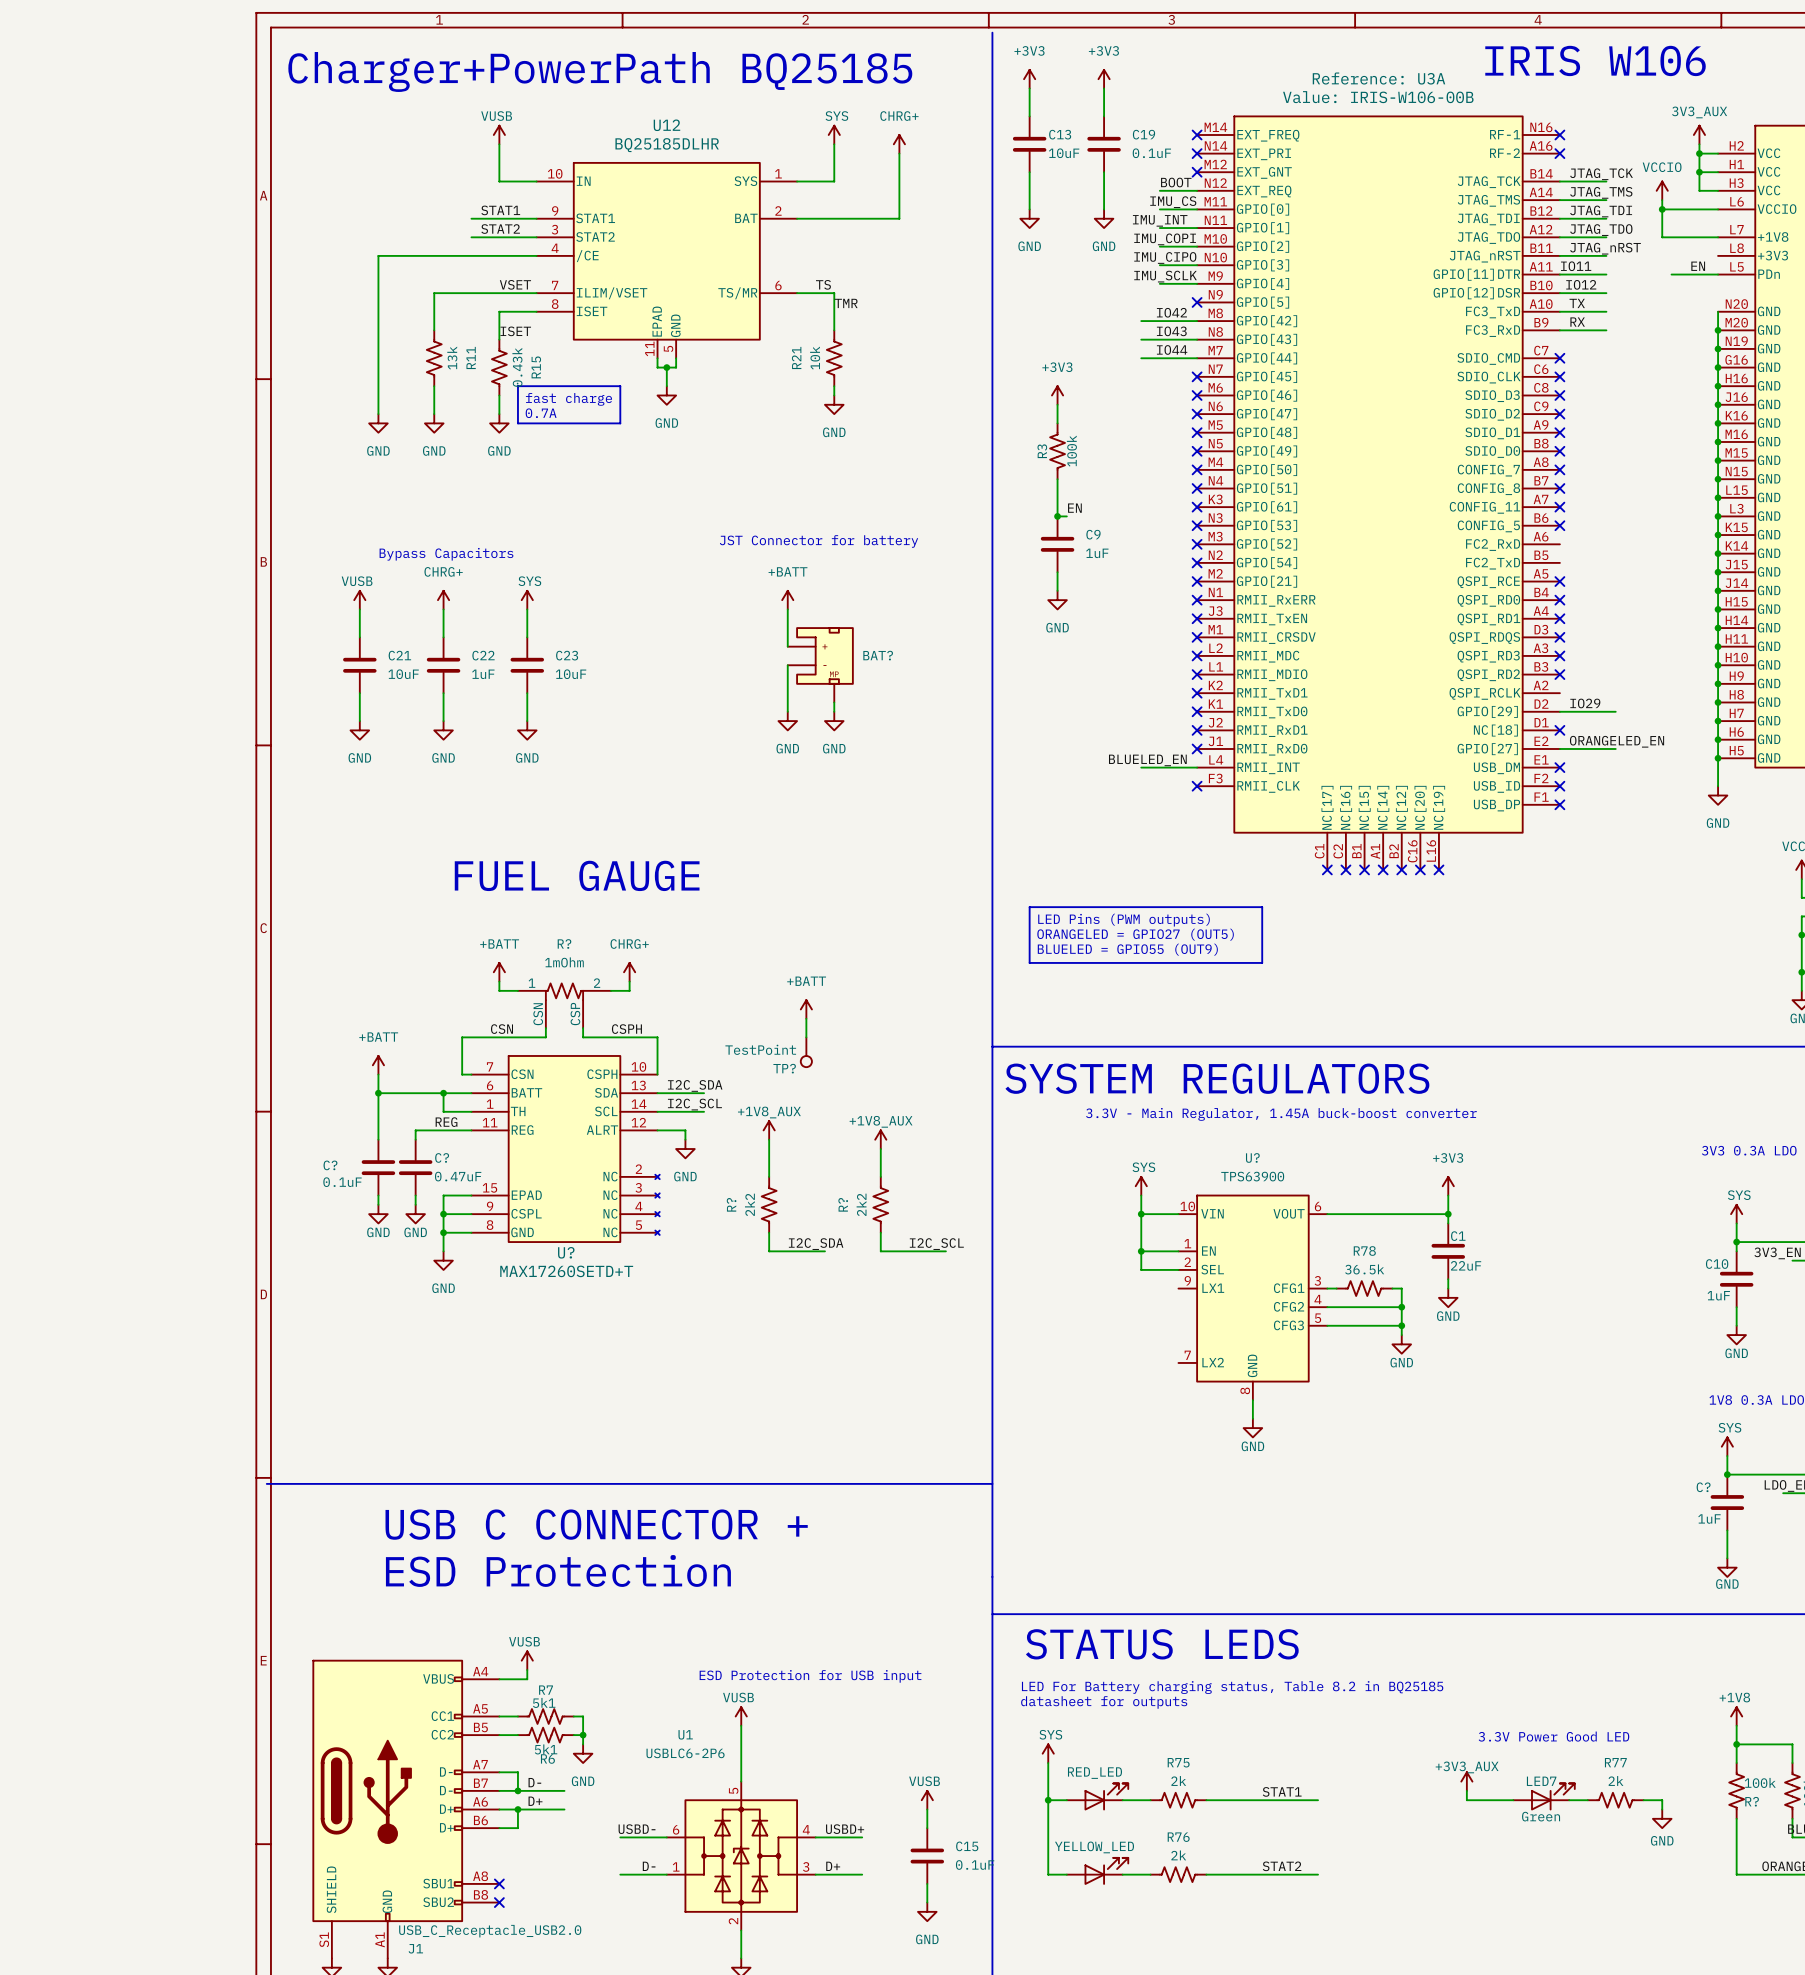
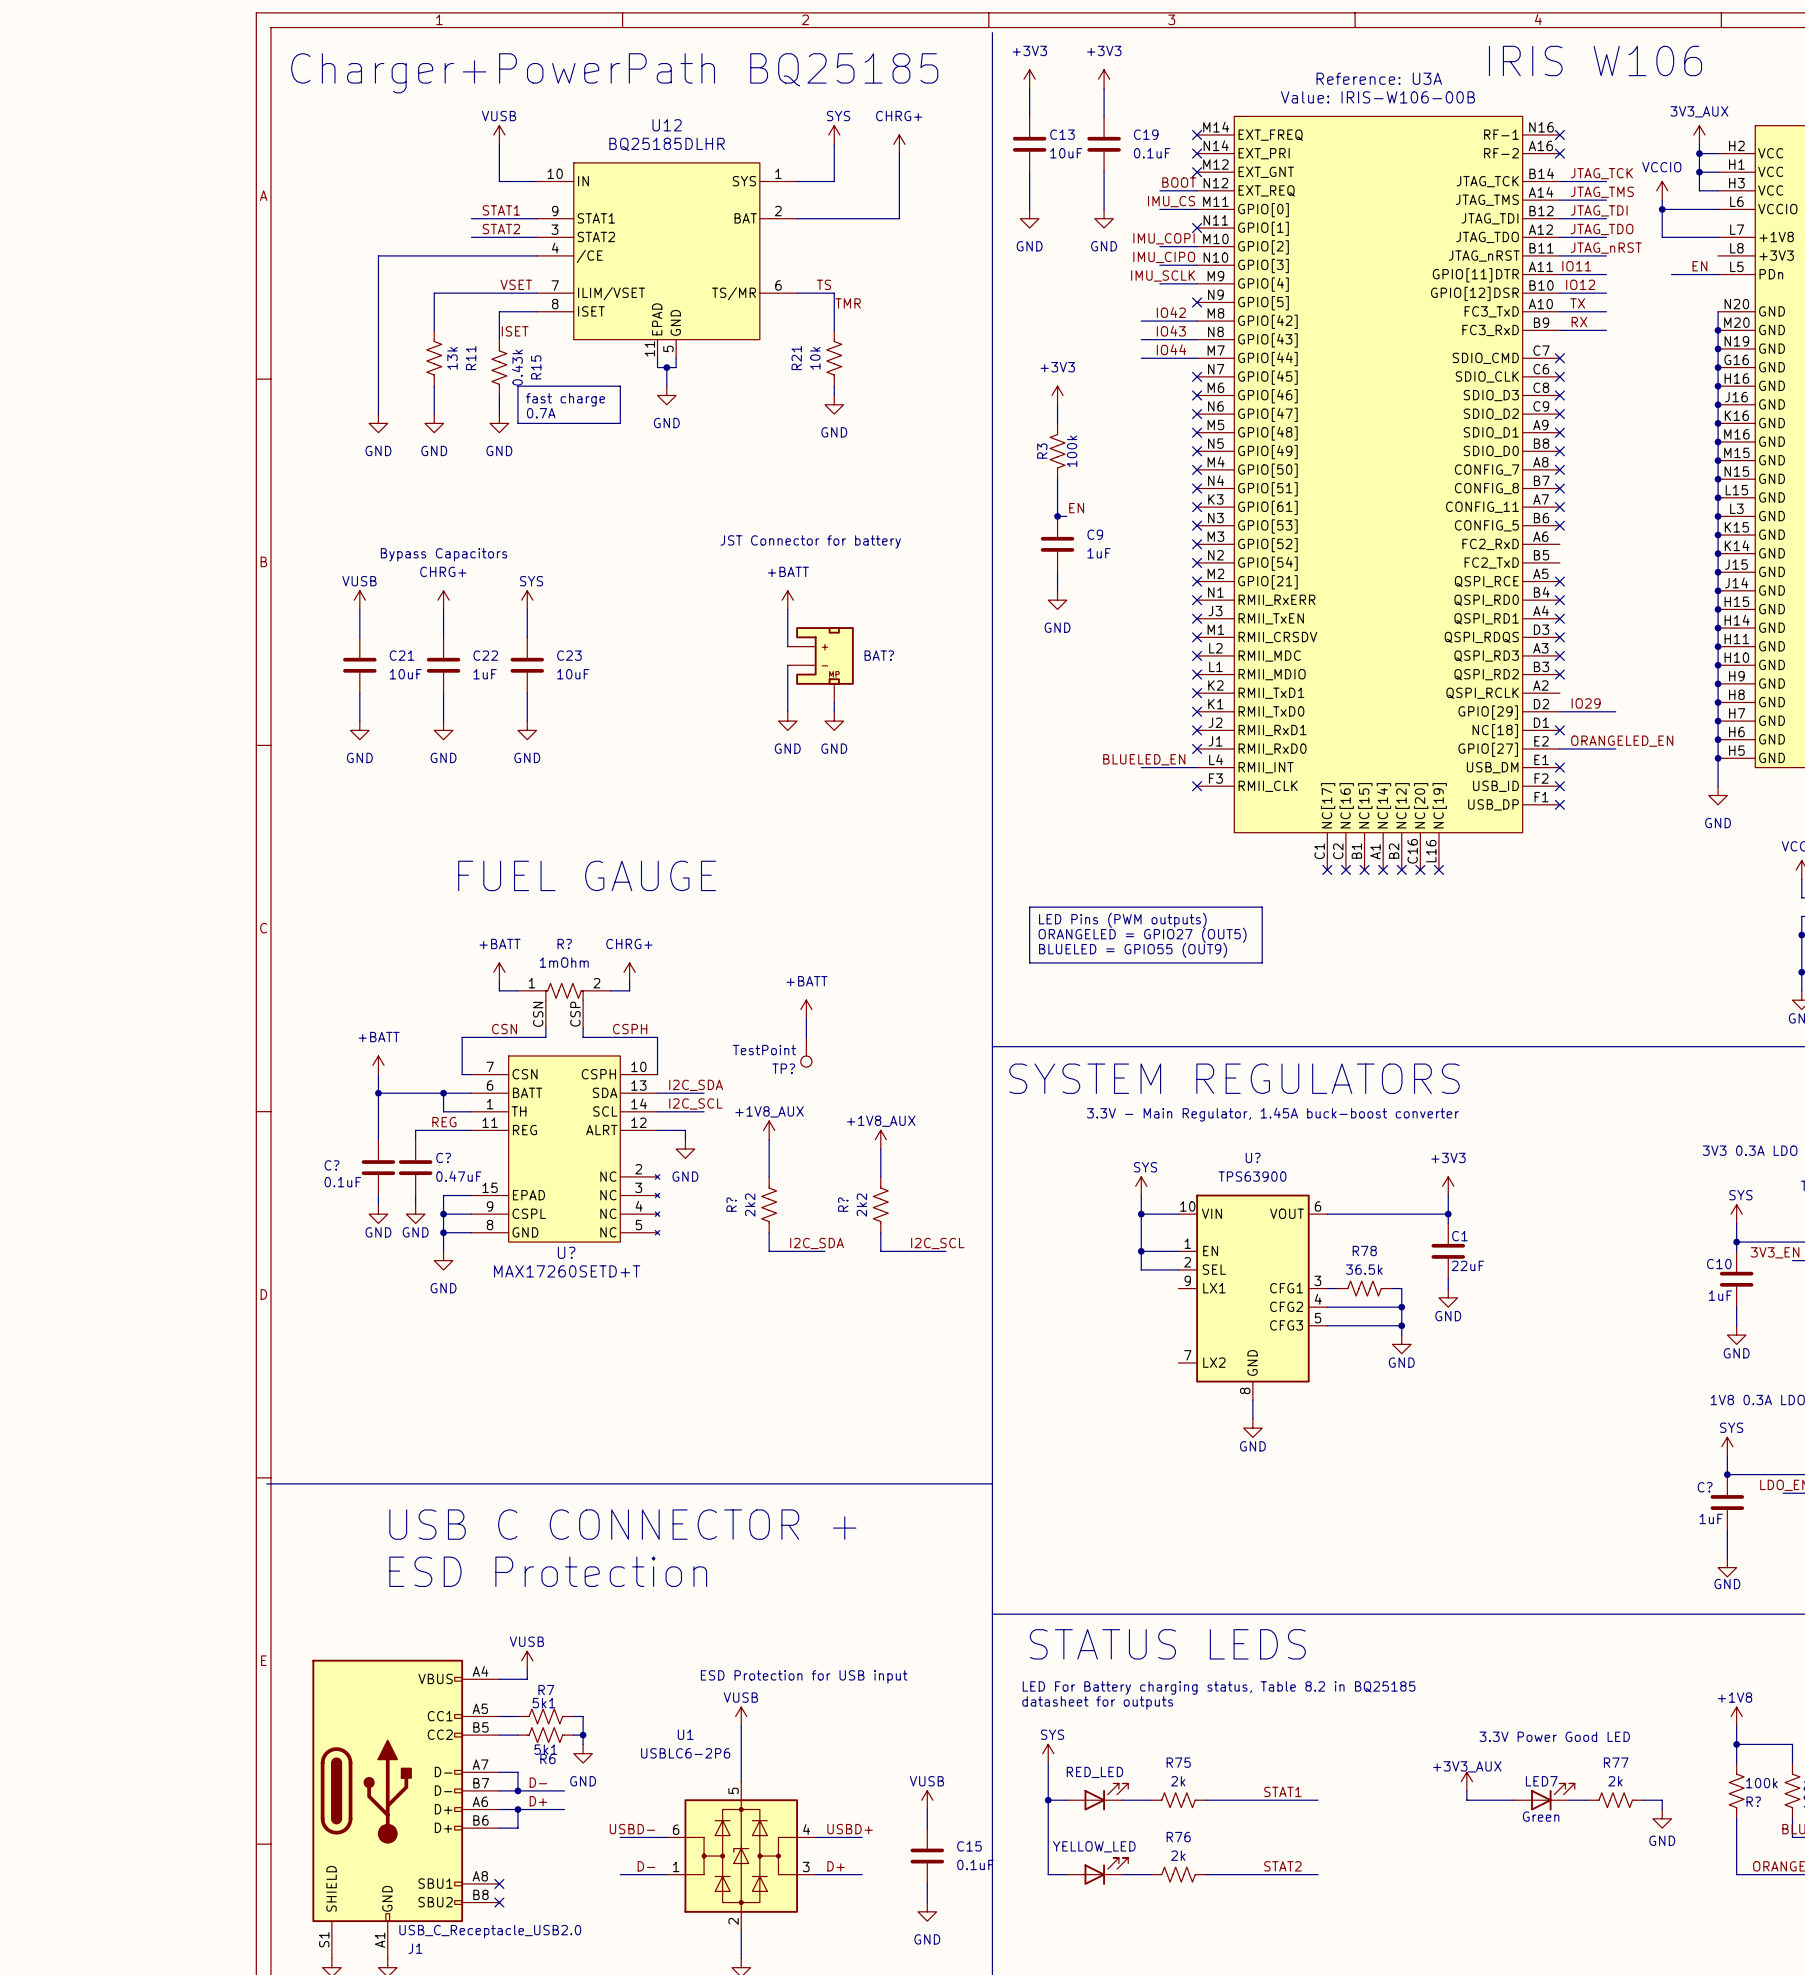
label: IMU_INT (1160, 220) -> none
wire: (1159, 228) (1197, 228) -> none
no-connect mark: none -> (1197, 228)

